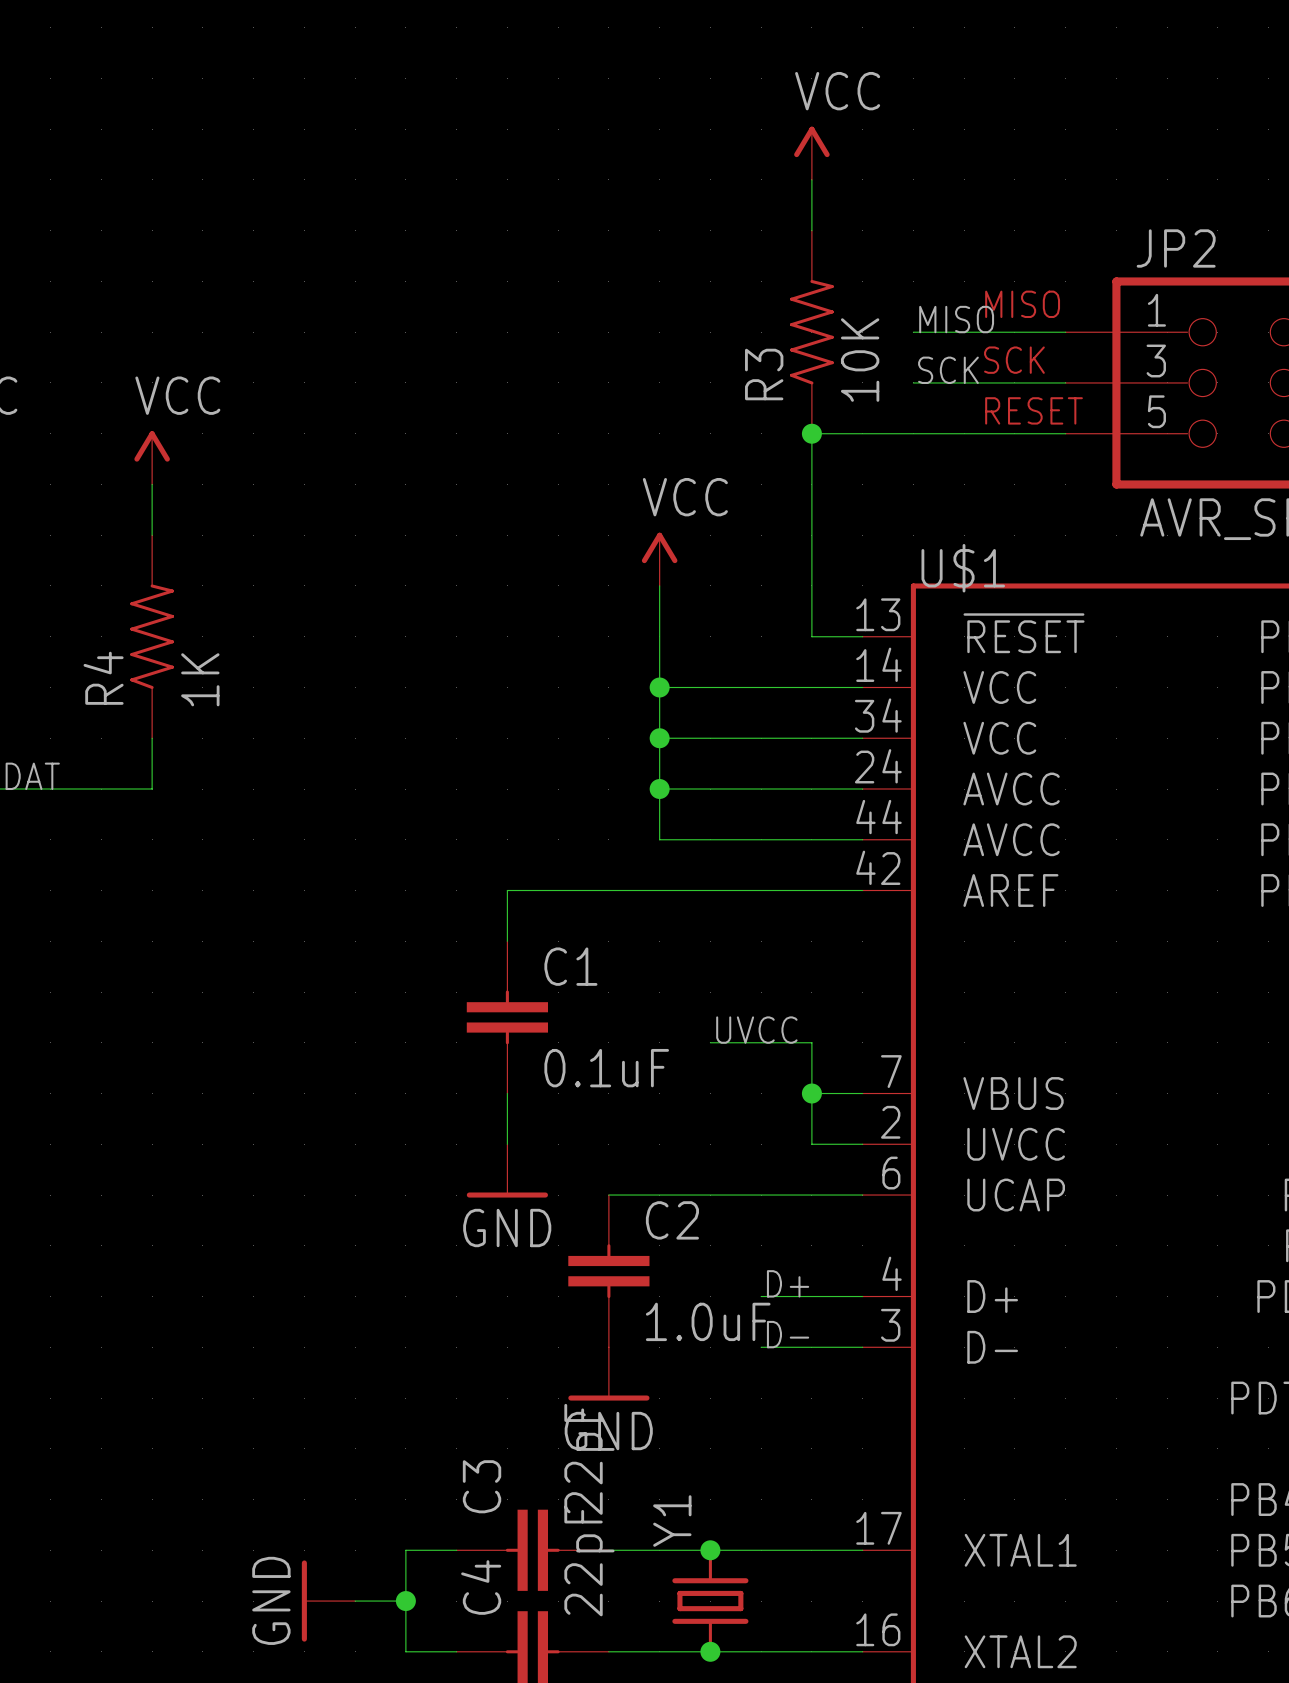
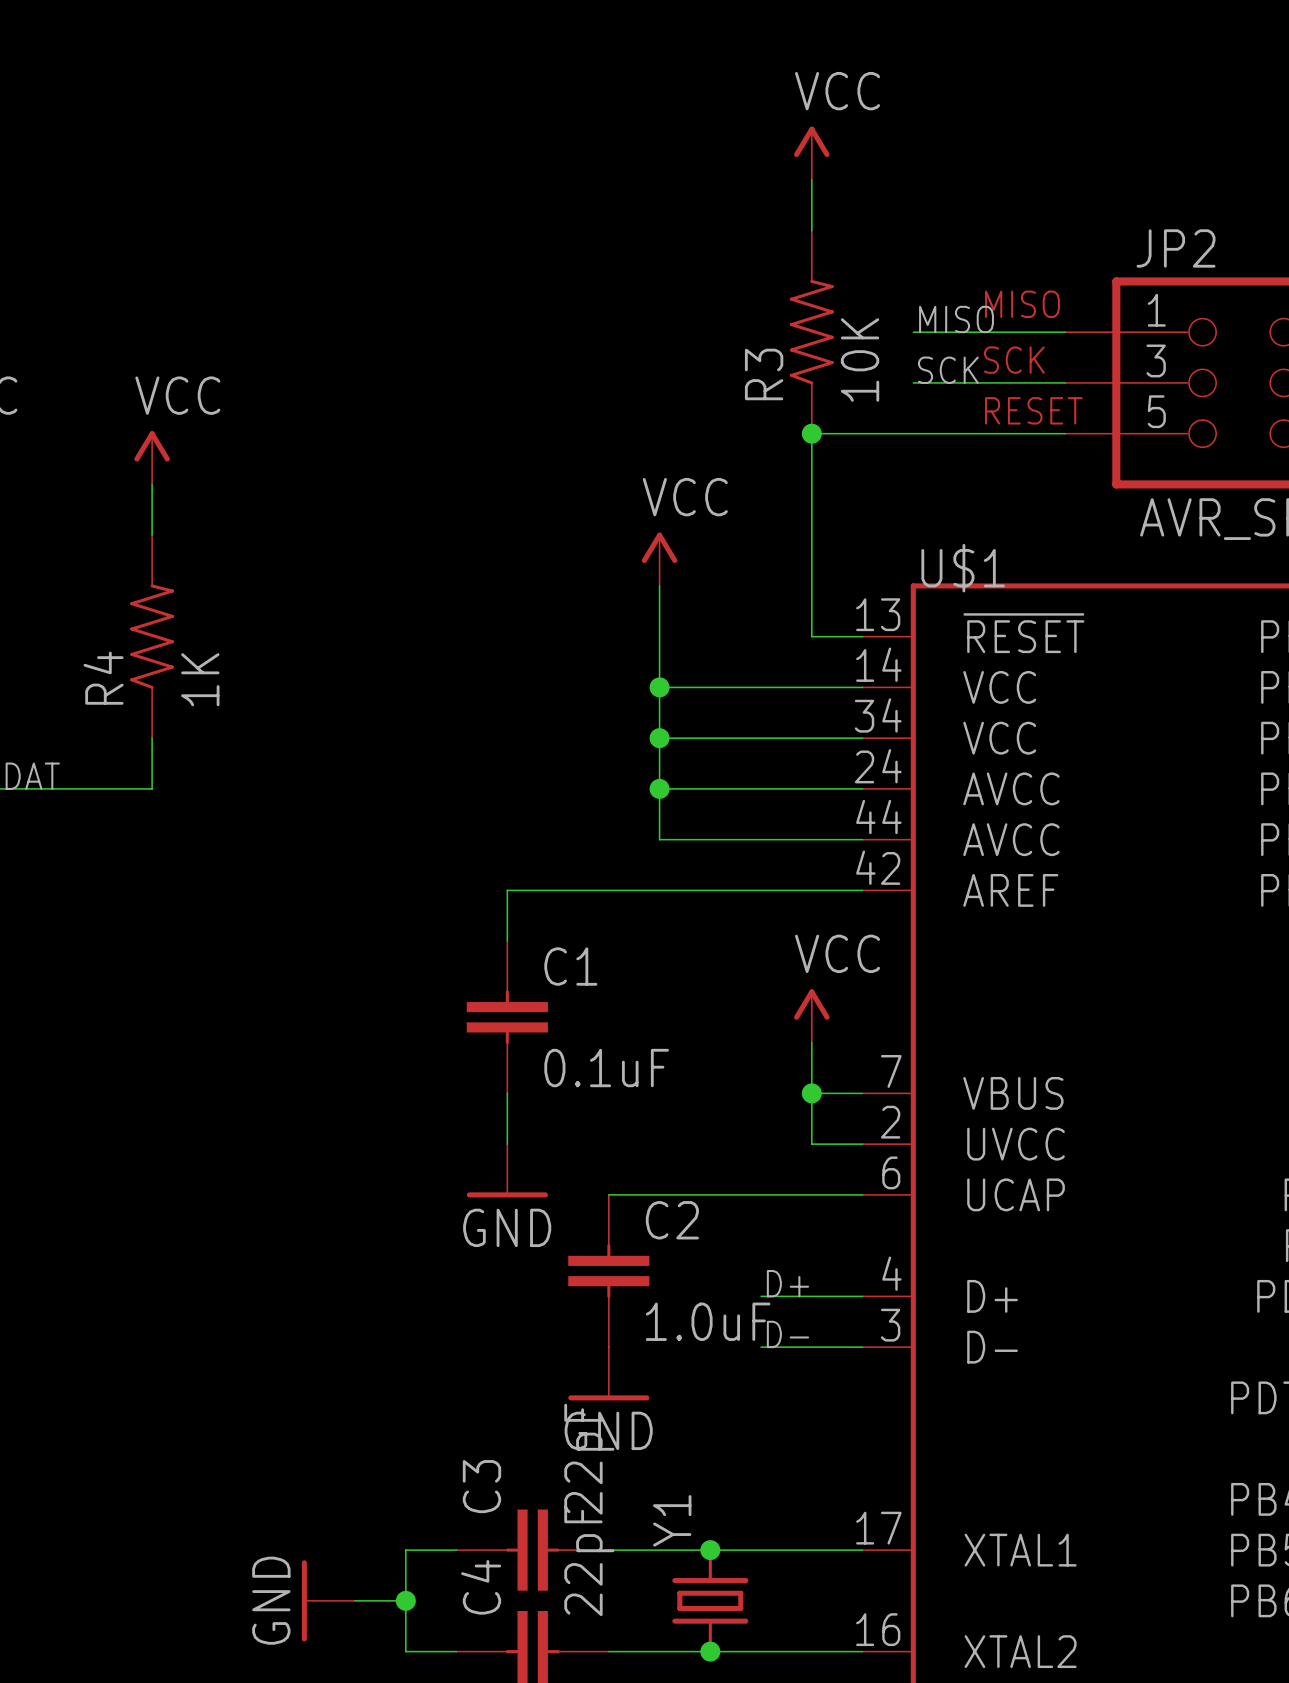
power symbol: none -> VCC (811, 1016)
label: UVCC (756, 1030) -> none
wire: (710, 1042) (811, 1042) -> none

